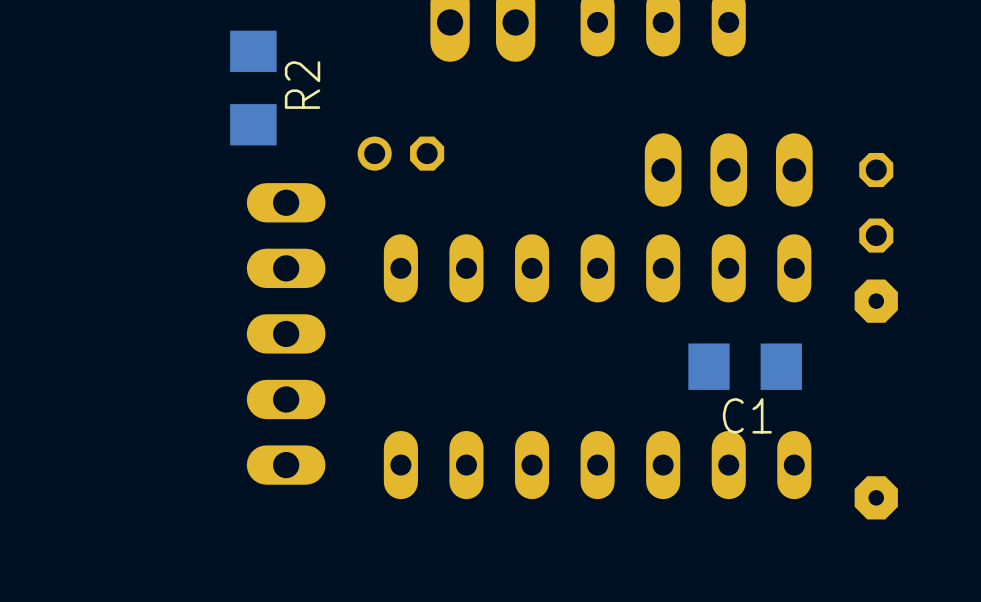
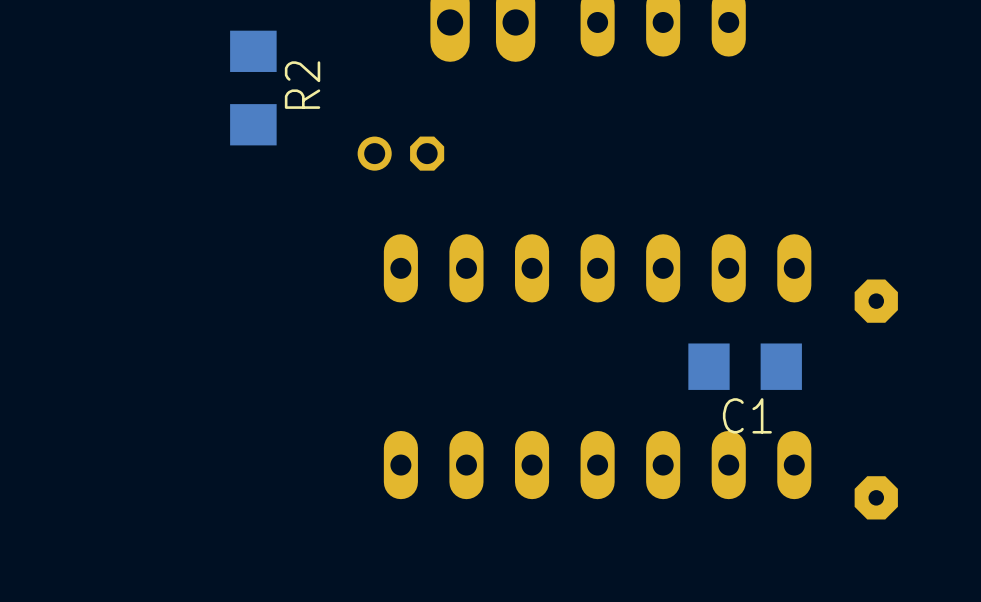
part: (728, 170) -> none
part: (876, 202) -> none
part: (286, 333) -> none

